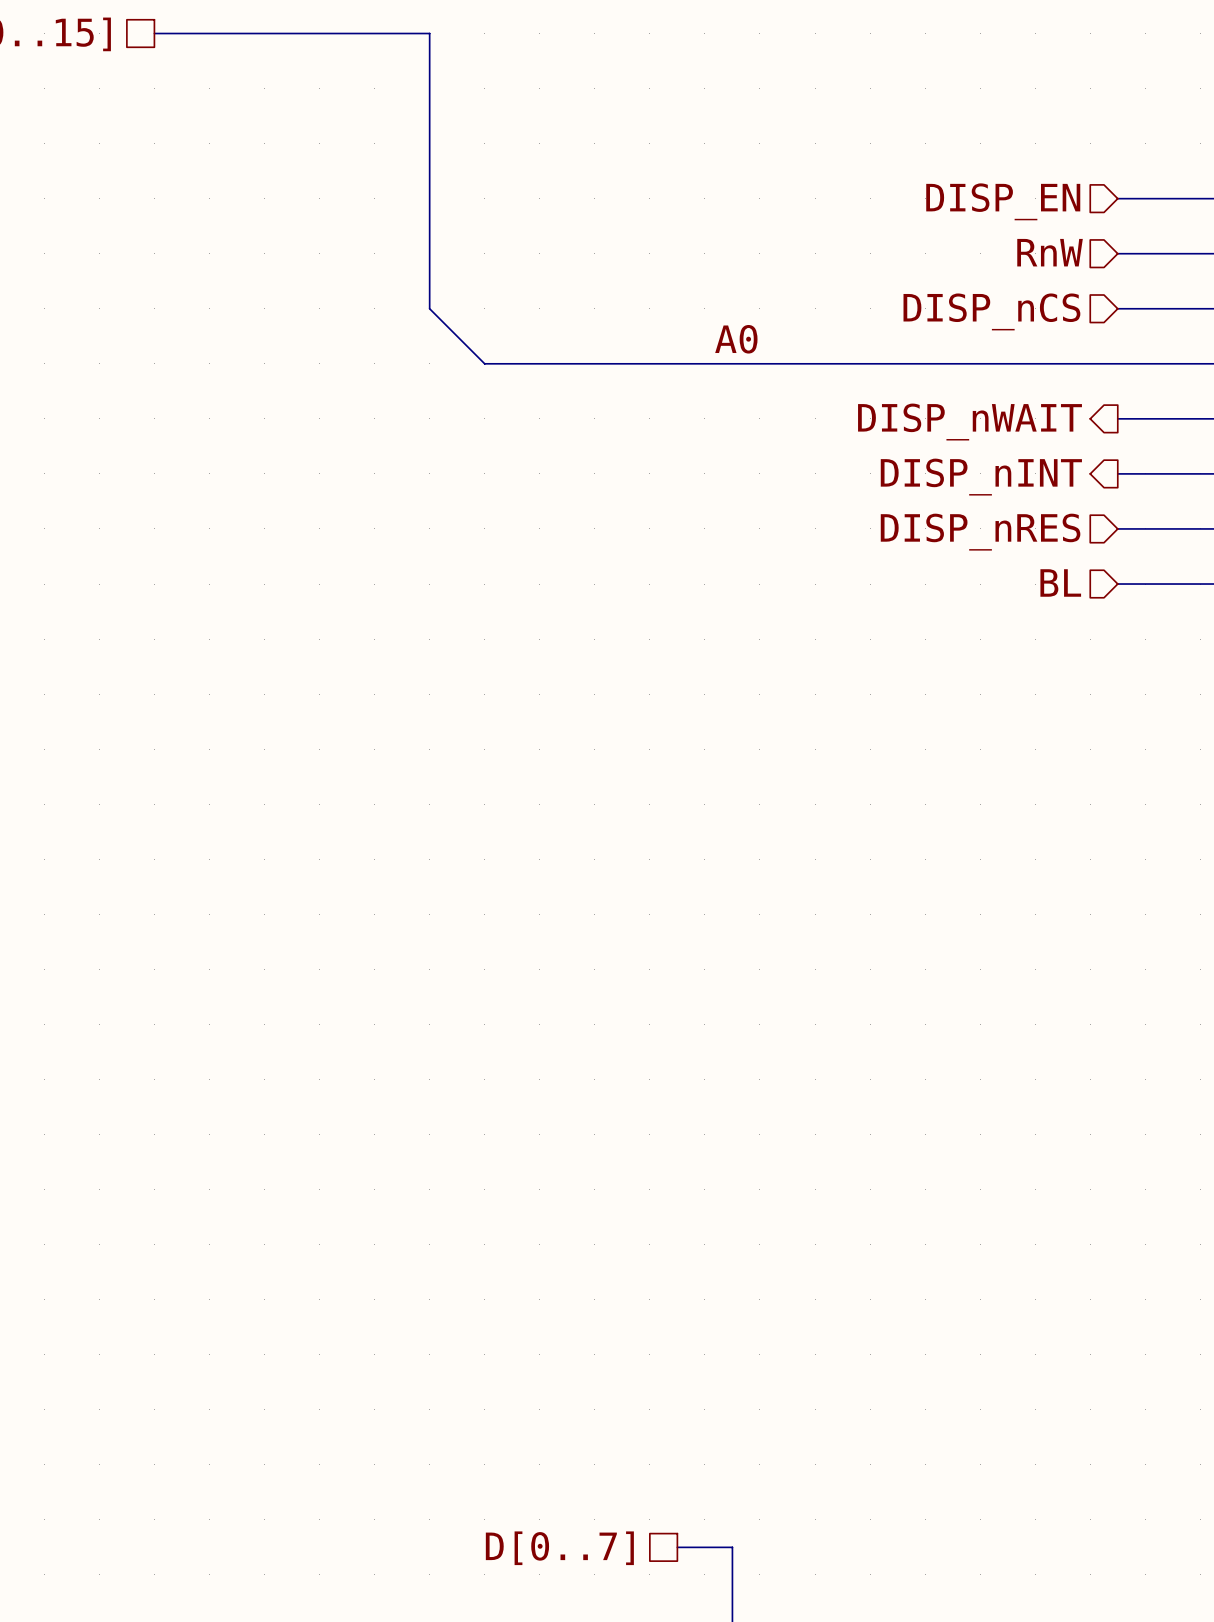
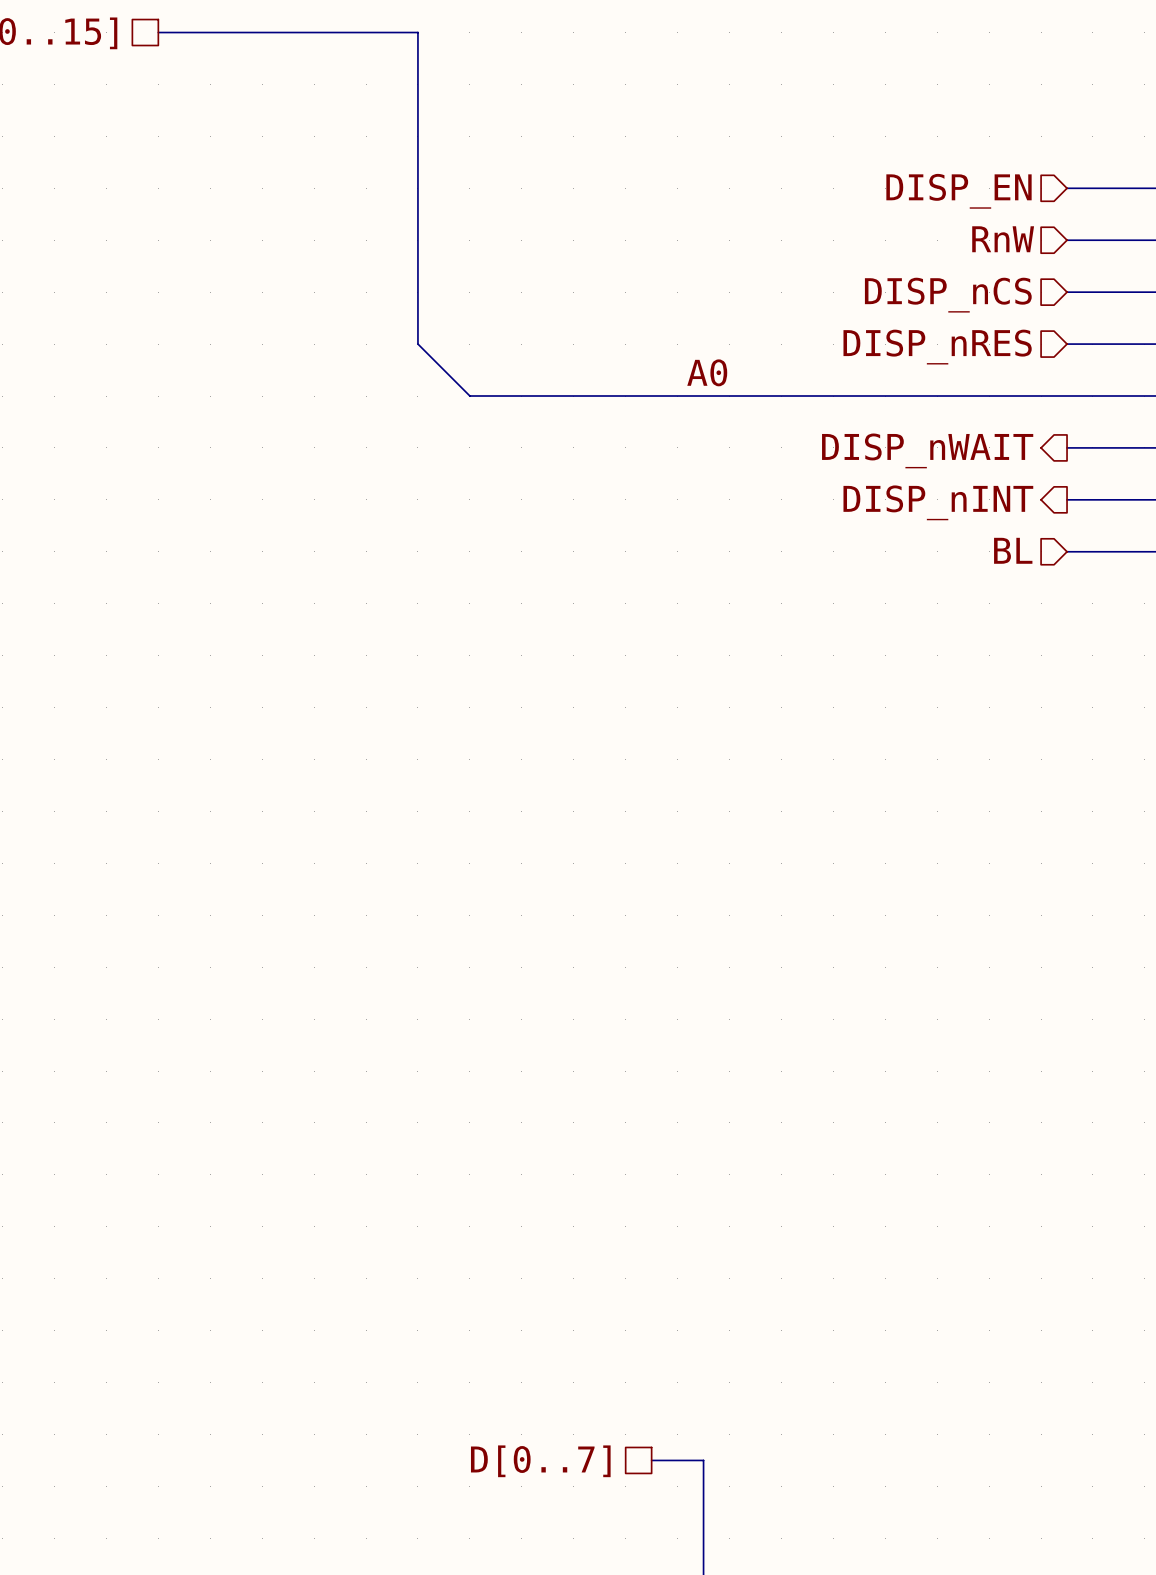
wire: (429, 308) (484, 363) (1117, 363) -> (417, 344) (469, 396) (1067, 396)
bus: none -> (417, 292) (417, 344)
label position: A0 (736, 339) -> A0 (707, 372)
hierarchical label shape: output (970, 422) -> input (937, 347)
hierarchical label: DISP_nWAIT (970, 422) -> DISP_nRES (937, 347)
hierarchical label: DISP_nINT (981, 477) -> DISP_nWAIT (927, 450)
hierarchical label shape: input (980, 532) -> output (938, 502)
hierarchical label: DISP_nRES (980, 532) -> DISP_nINT (938, 502)

